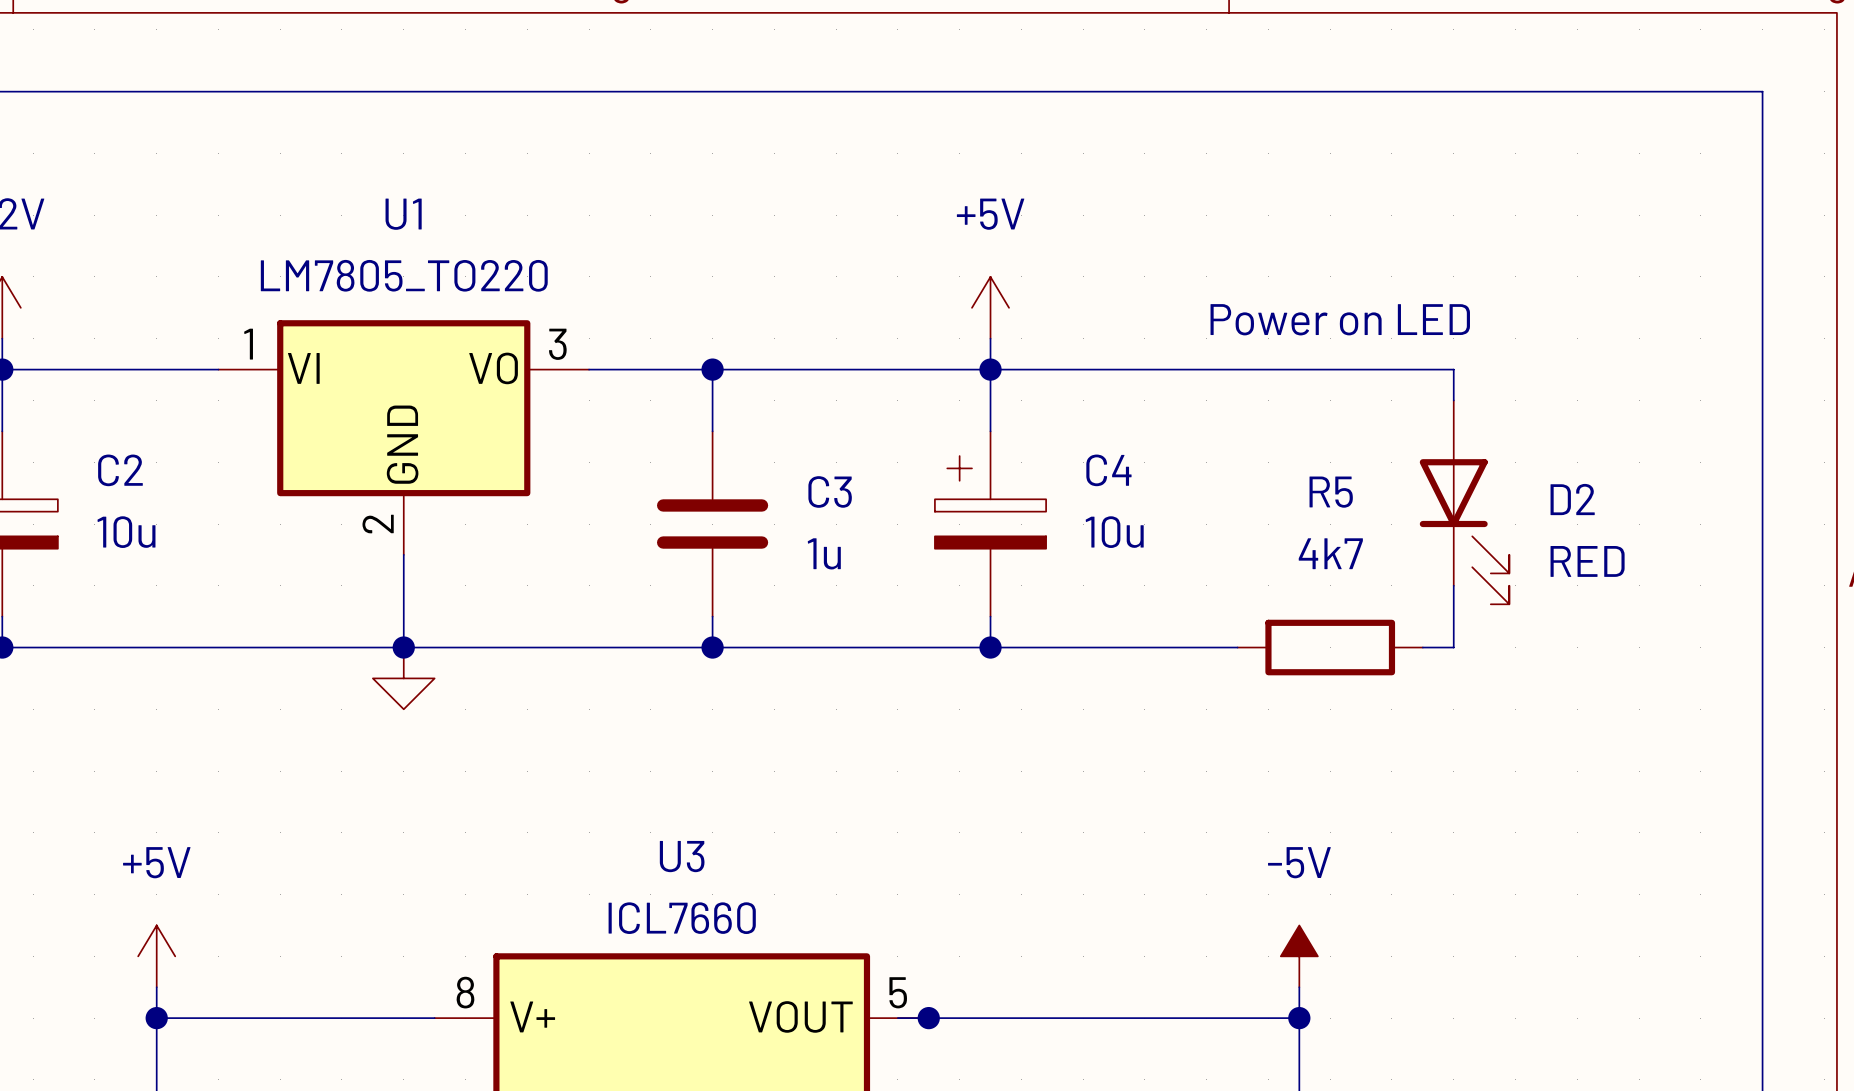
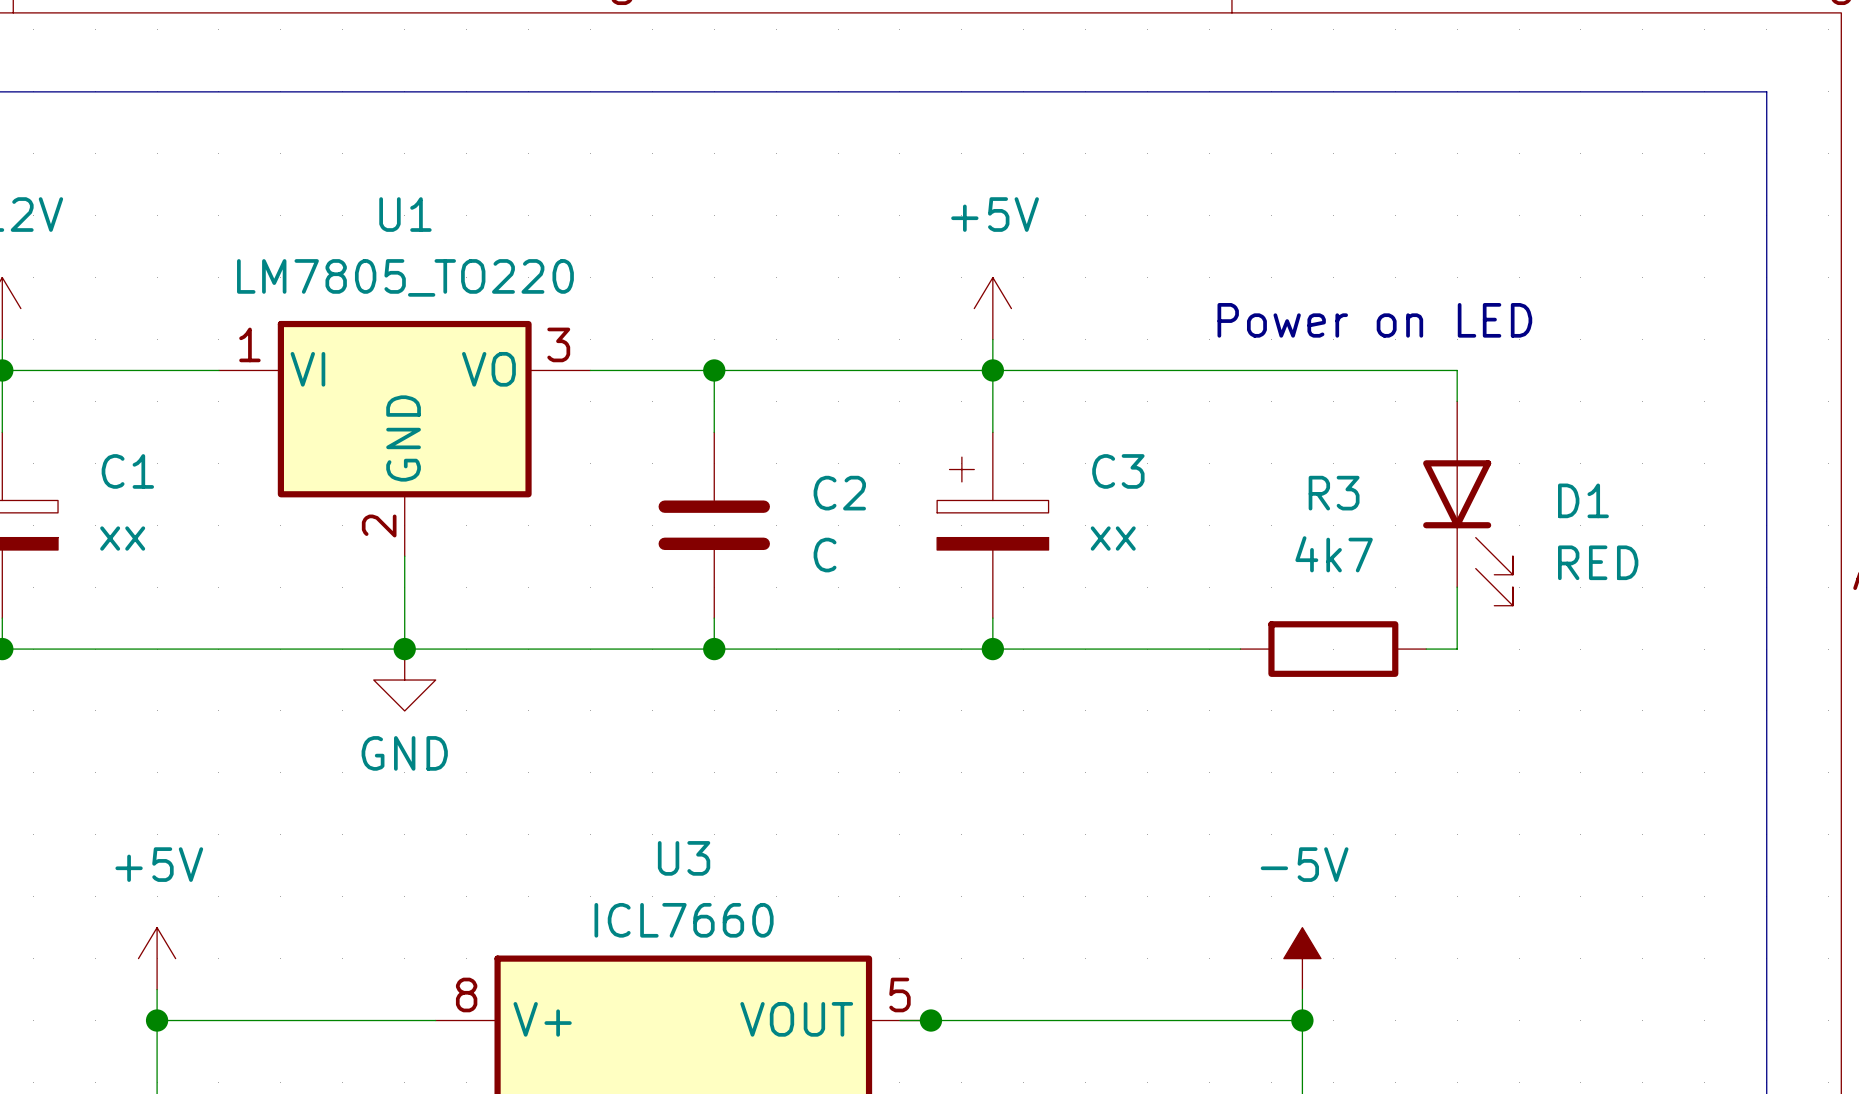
C2 name: C2 (120, 470) -> C1 (127, 471)
C4 name: C4 (1108, 470) -> C3 (1118, 471)
C3 name: C3 (830, 491) -> C2 (839, 493)
R5 name: R5 (1331, 492) -> R3 (1334, 493)
D2 name: D2 (1572, 499) -> D1 (1583, 500)
C2 value: 10u (126, 532) -> xx (122, 538)
C4 value: 10u (1114, 532) -> xx (1113, 538)
C3 value: 1u (824, 553) -> C (825, 555)
power symbol text: none -> GND (404, 753)

